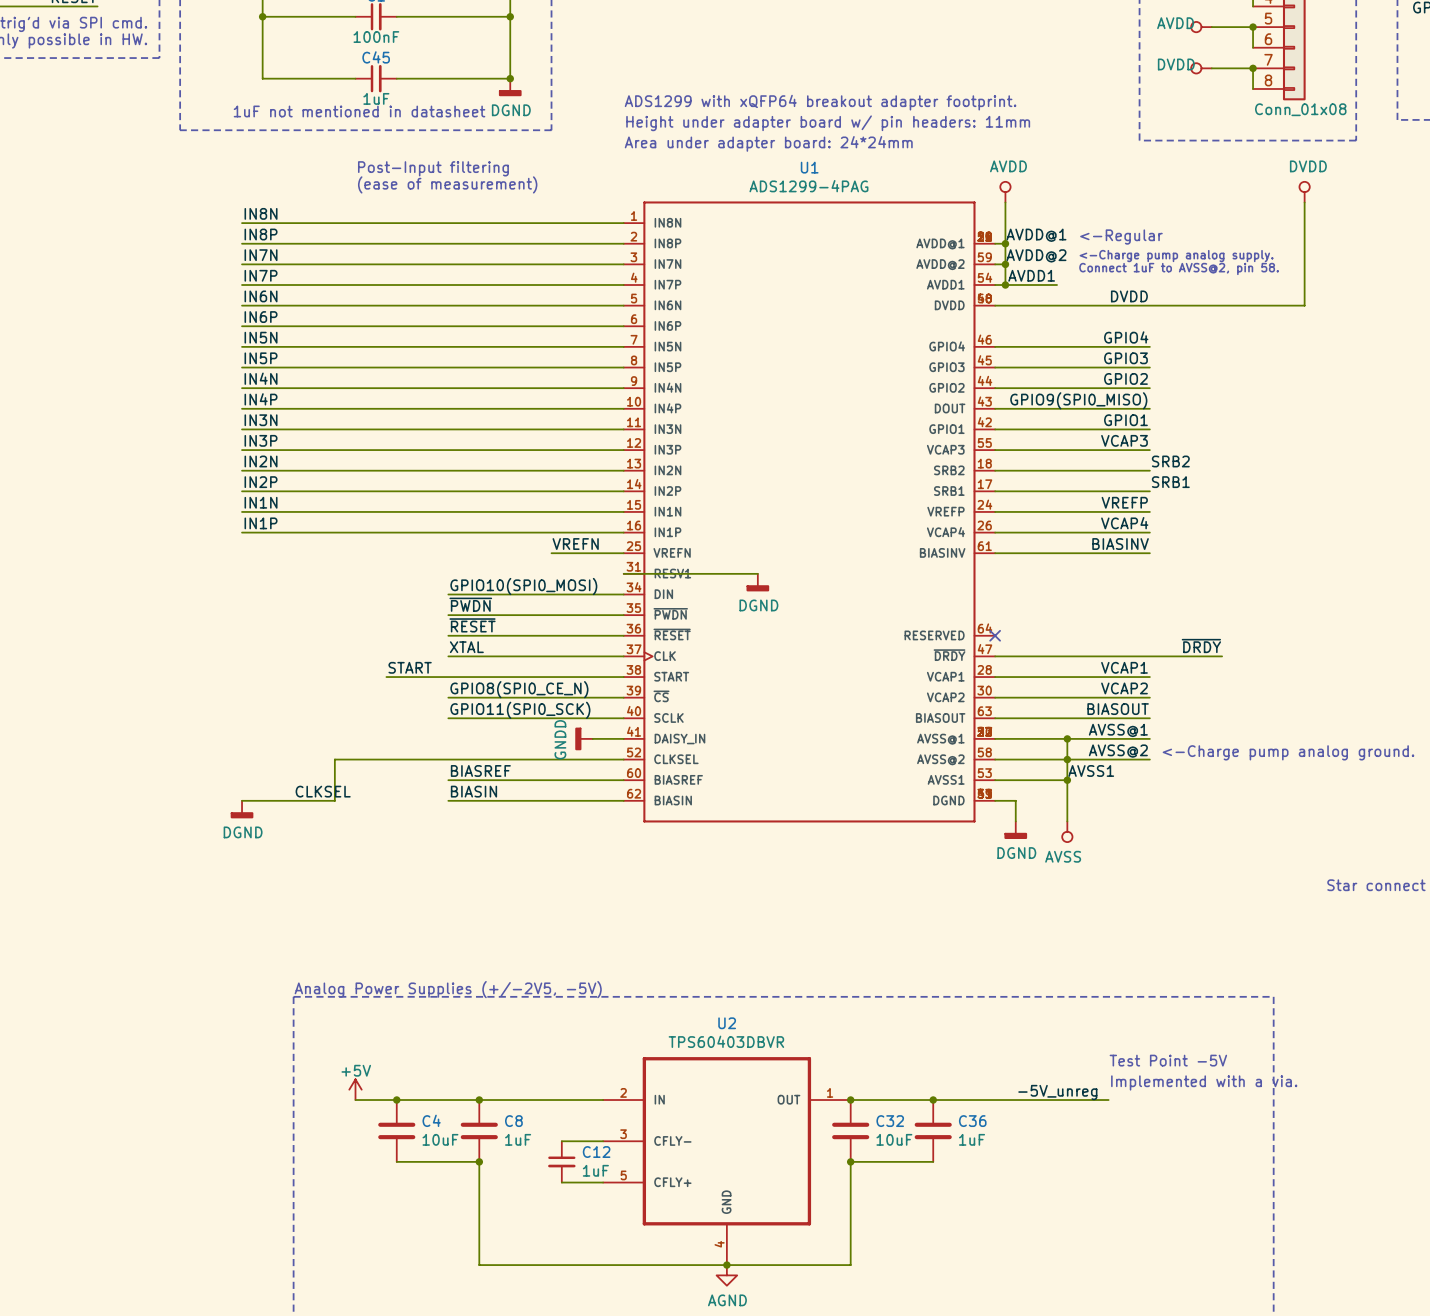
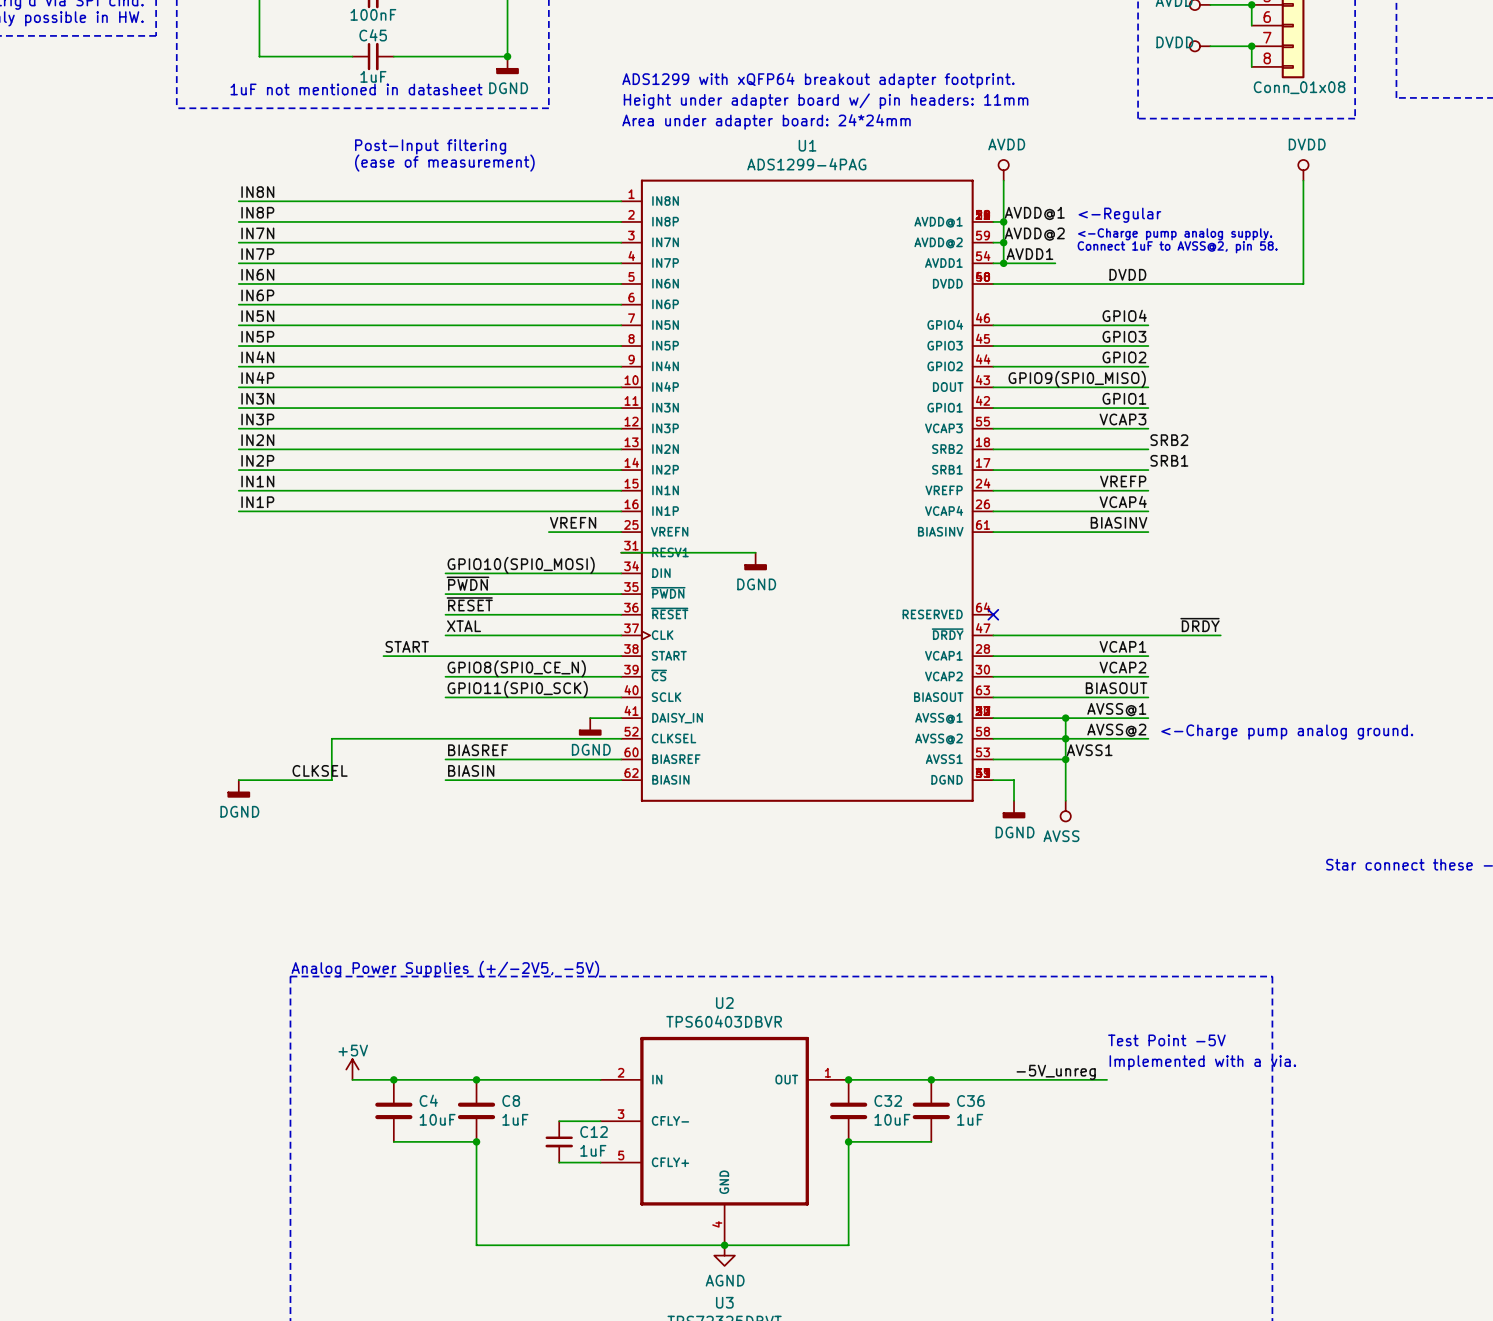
power symbol: GNDD (584, 738) -> none
power symbol: none -> DGND (590, 726)

